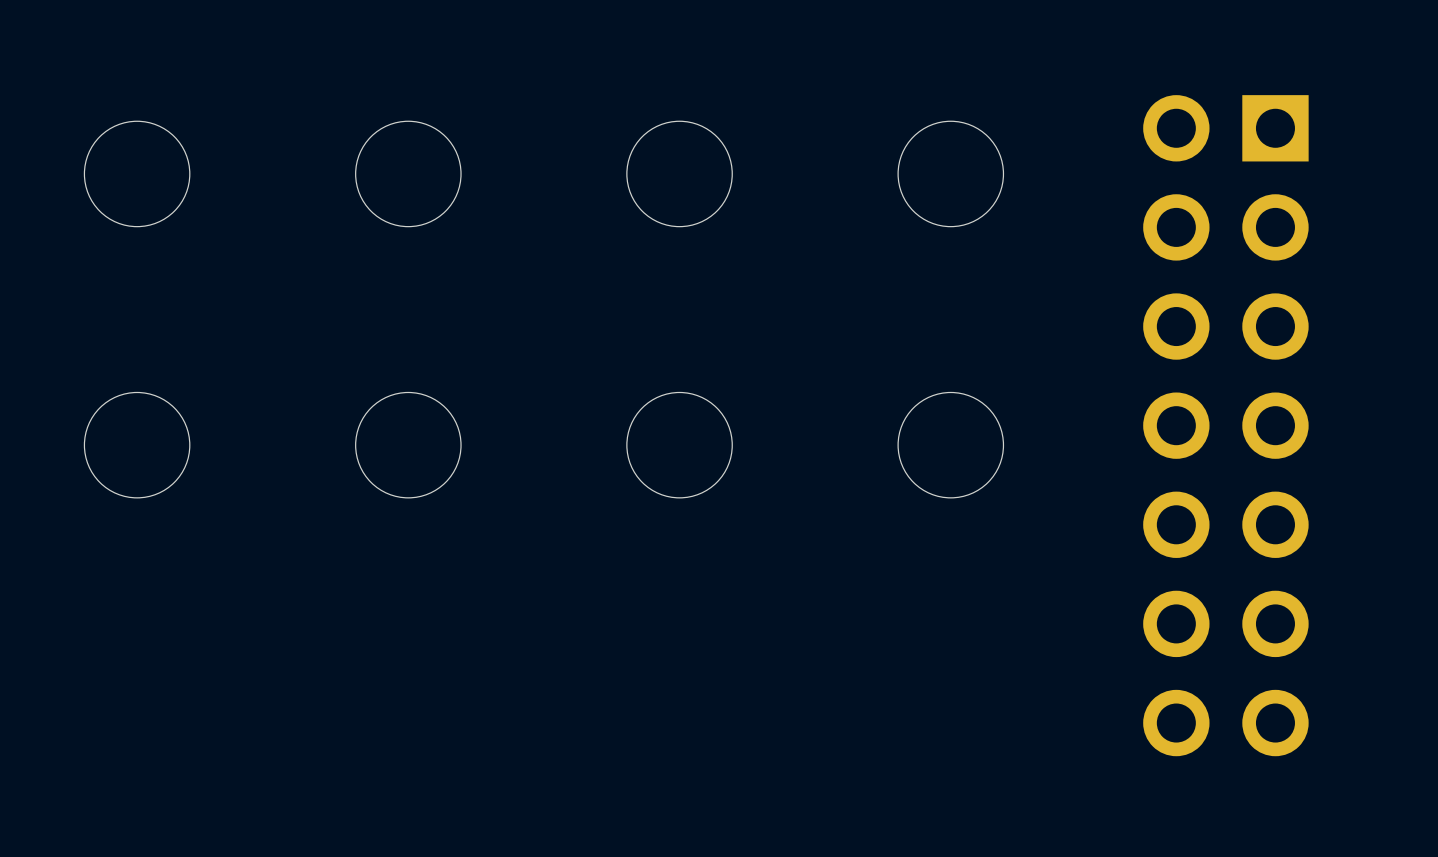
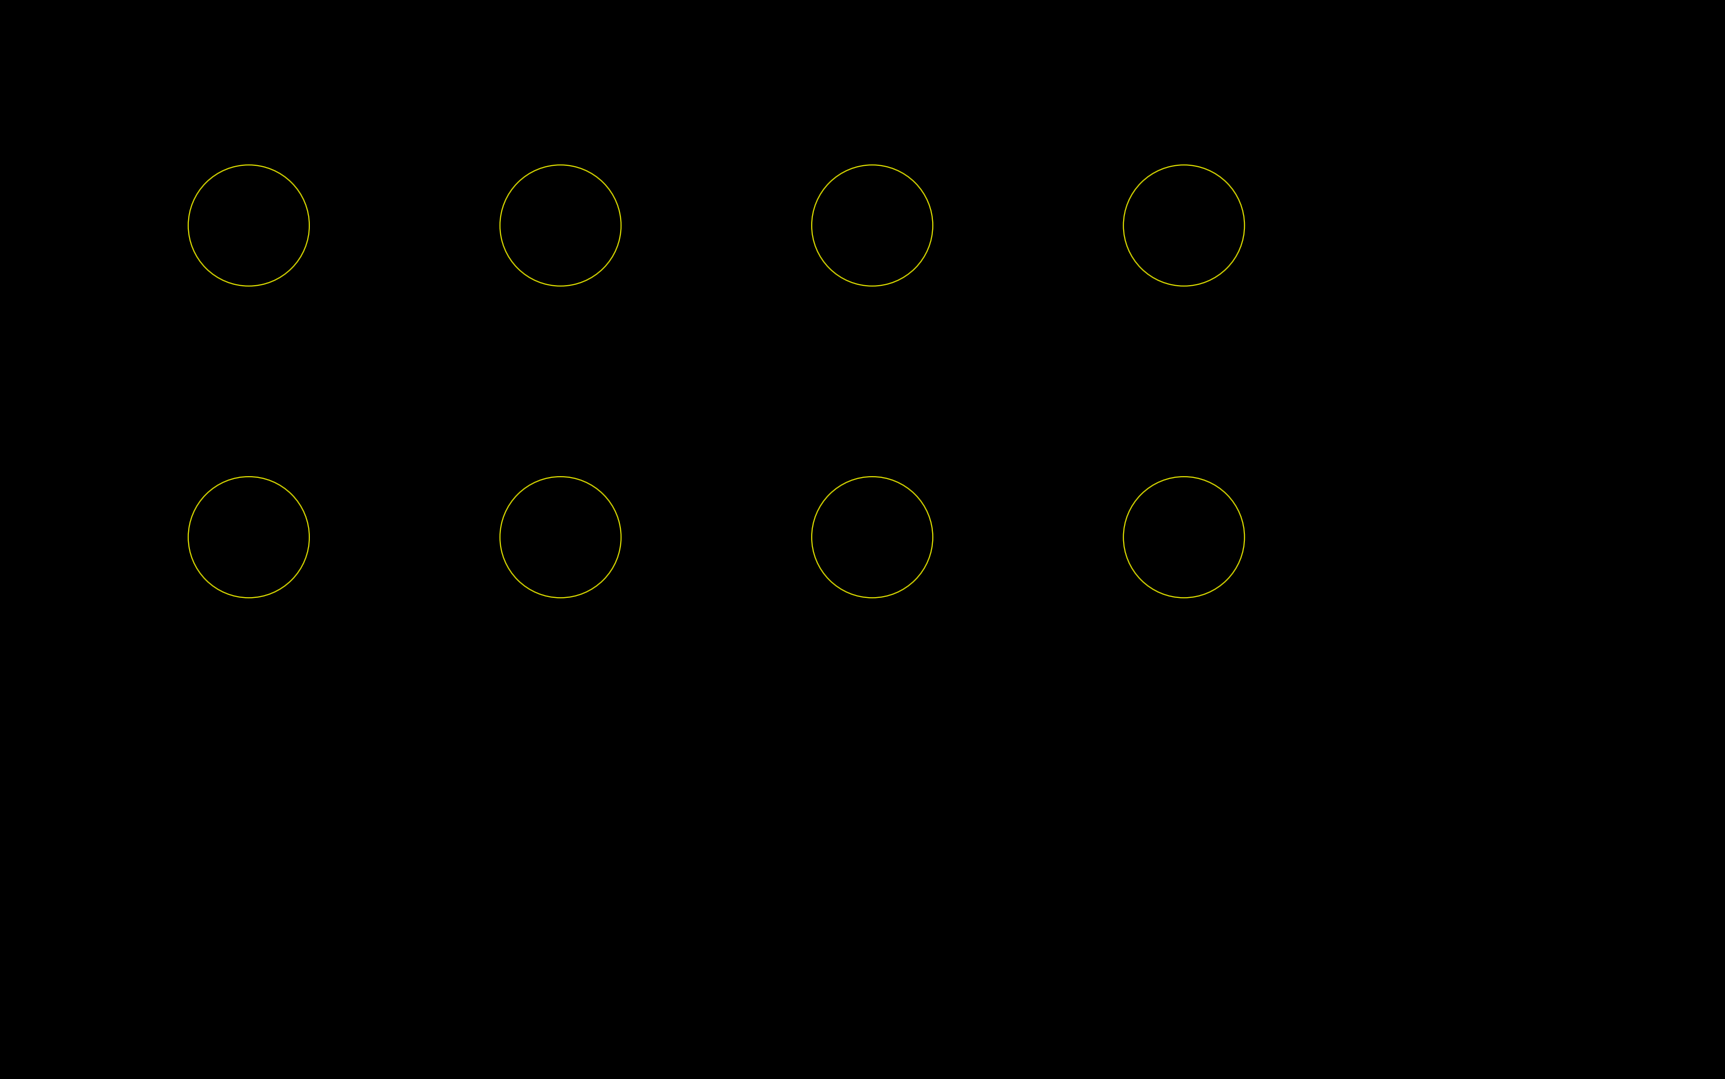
part: (1225, 425) -> none

